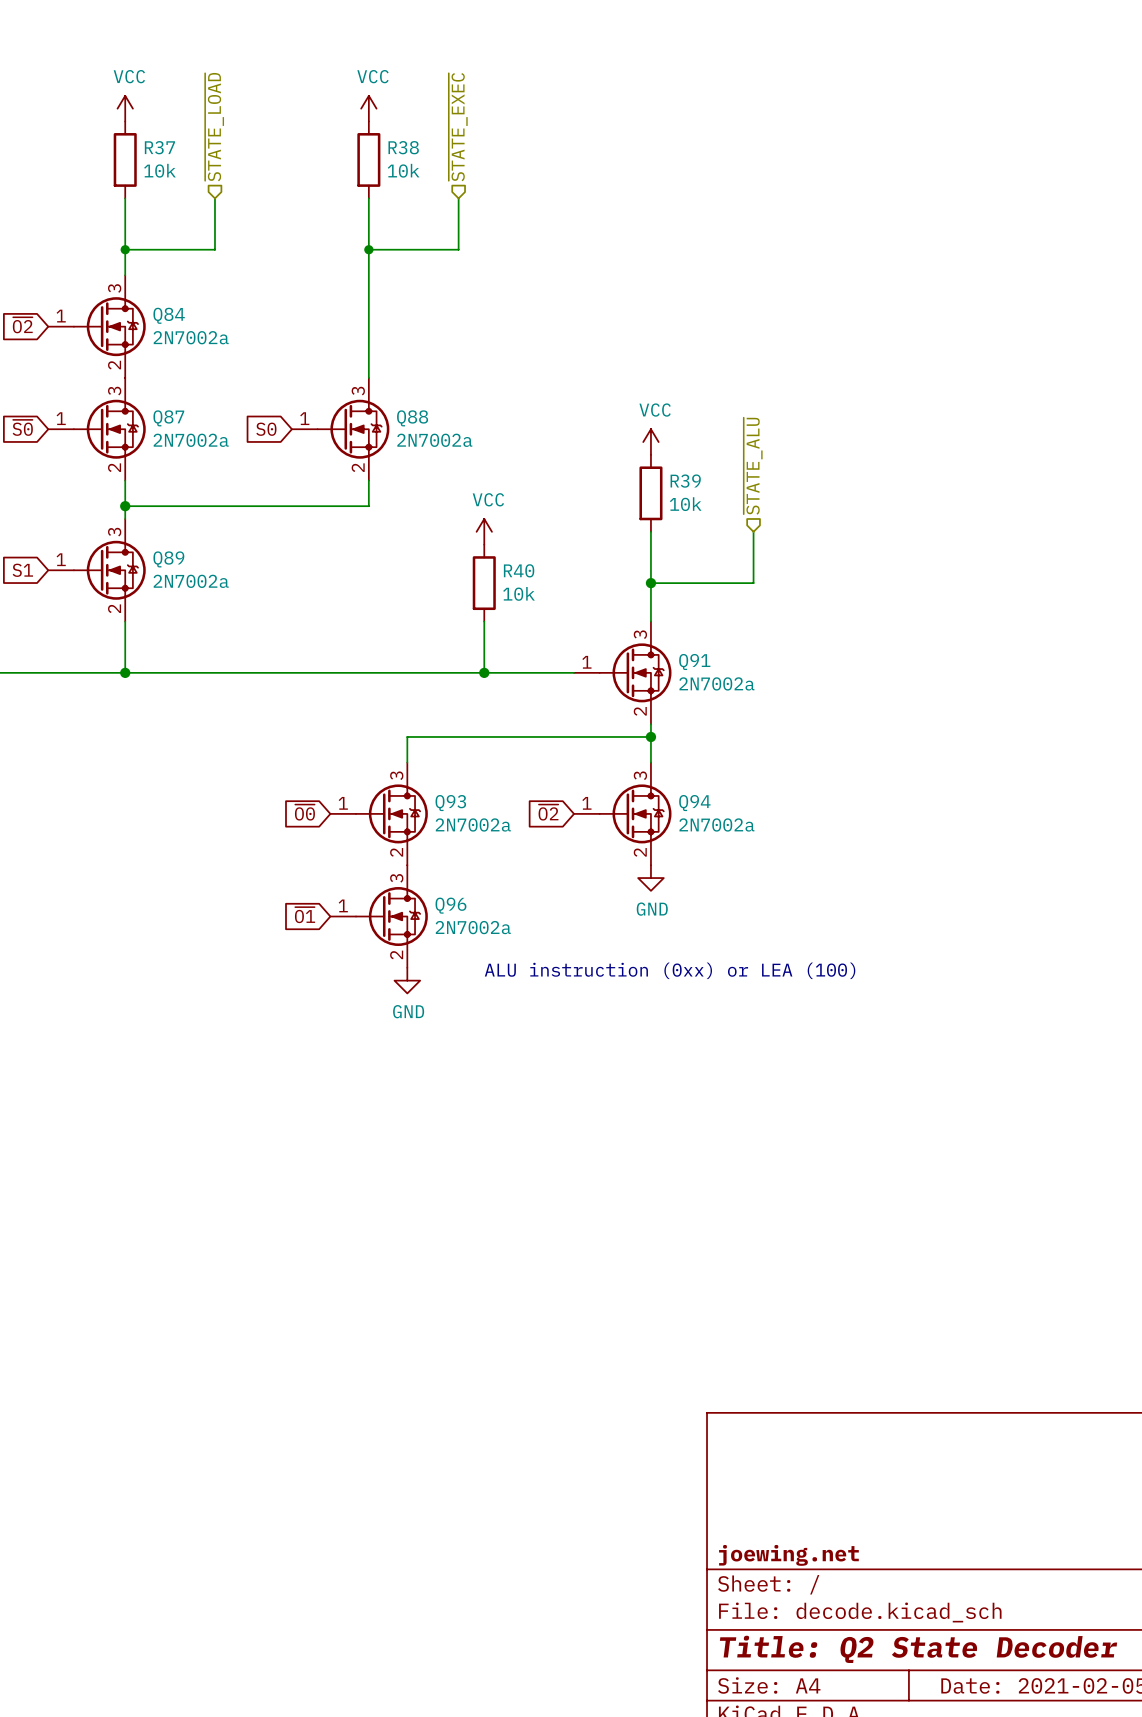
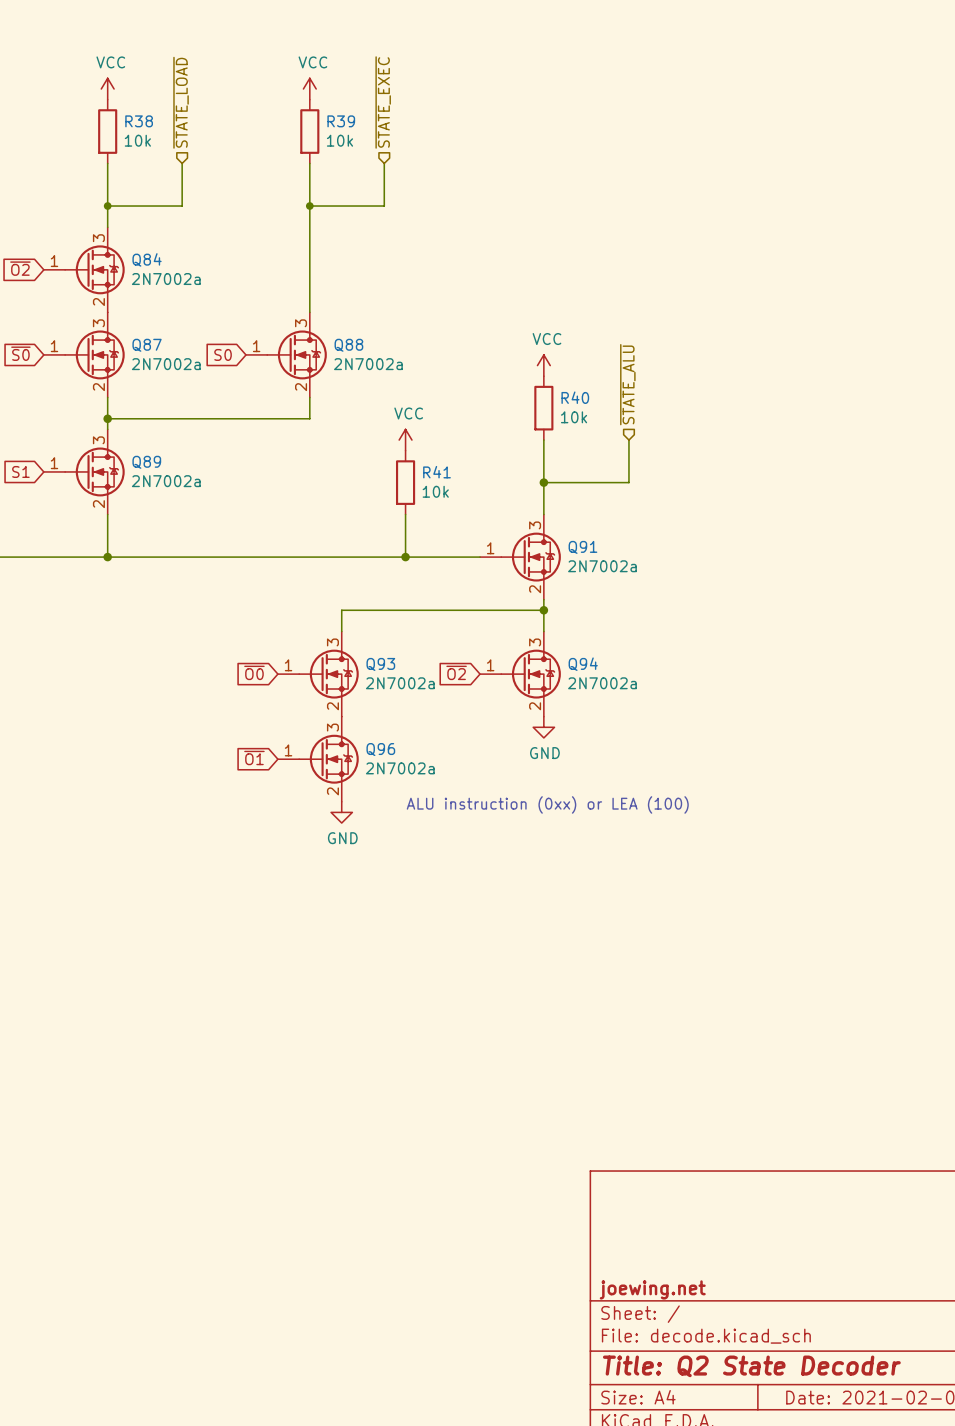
R37 name: R37 (159, 147) -> R38 (139, 121)
R38 name: R38 (403, 147) -> R39 (341, 121)
R39 name: R39 (685, 481) -> R40 (575, 397)
R40 name: R40 (519, 570) -> R41 (437, 472)

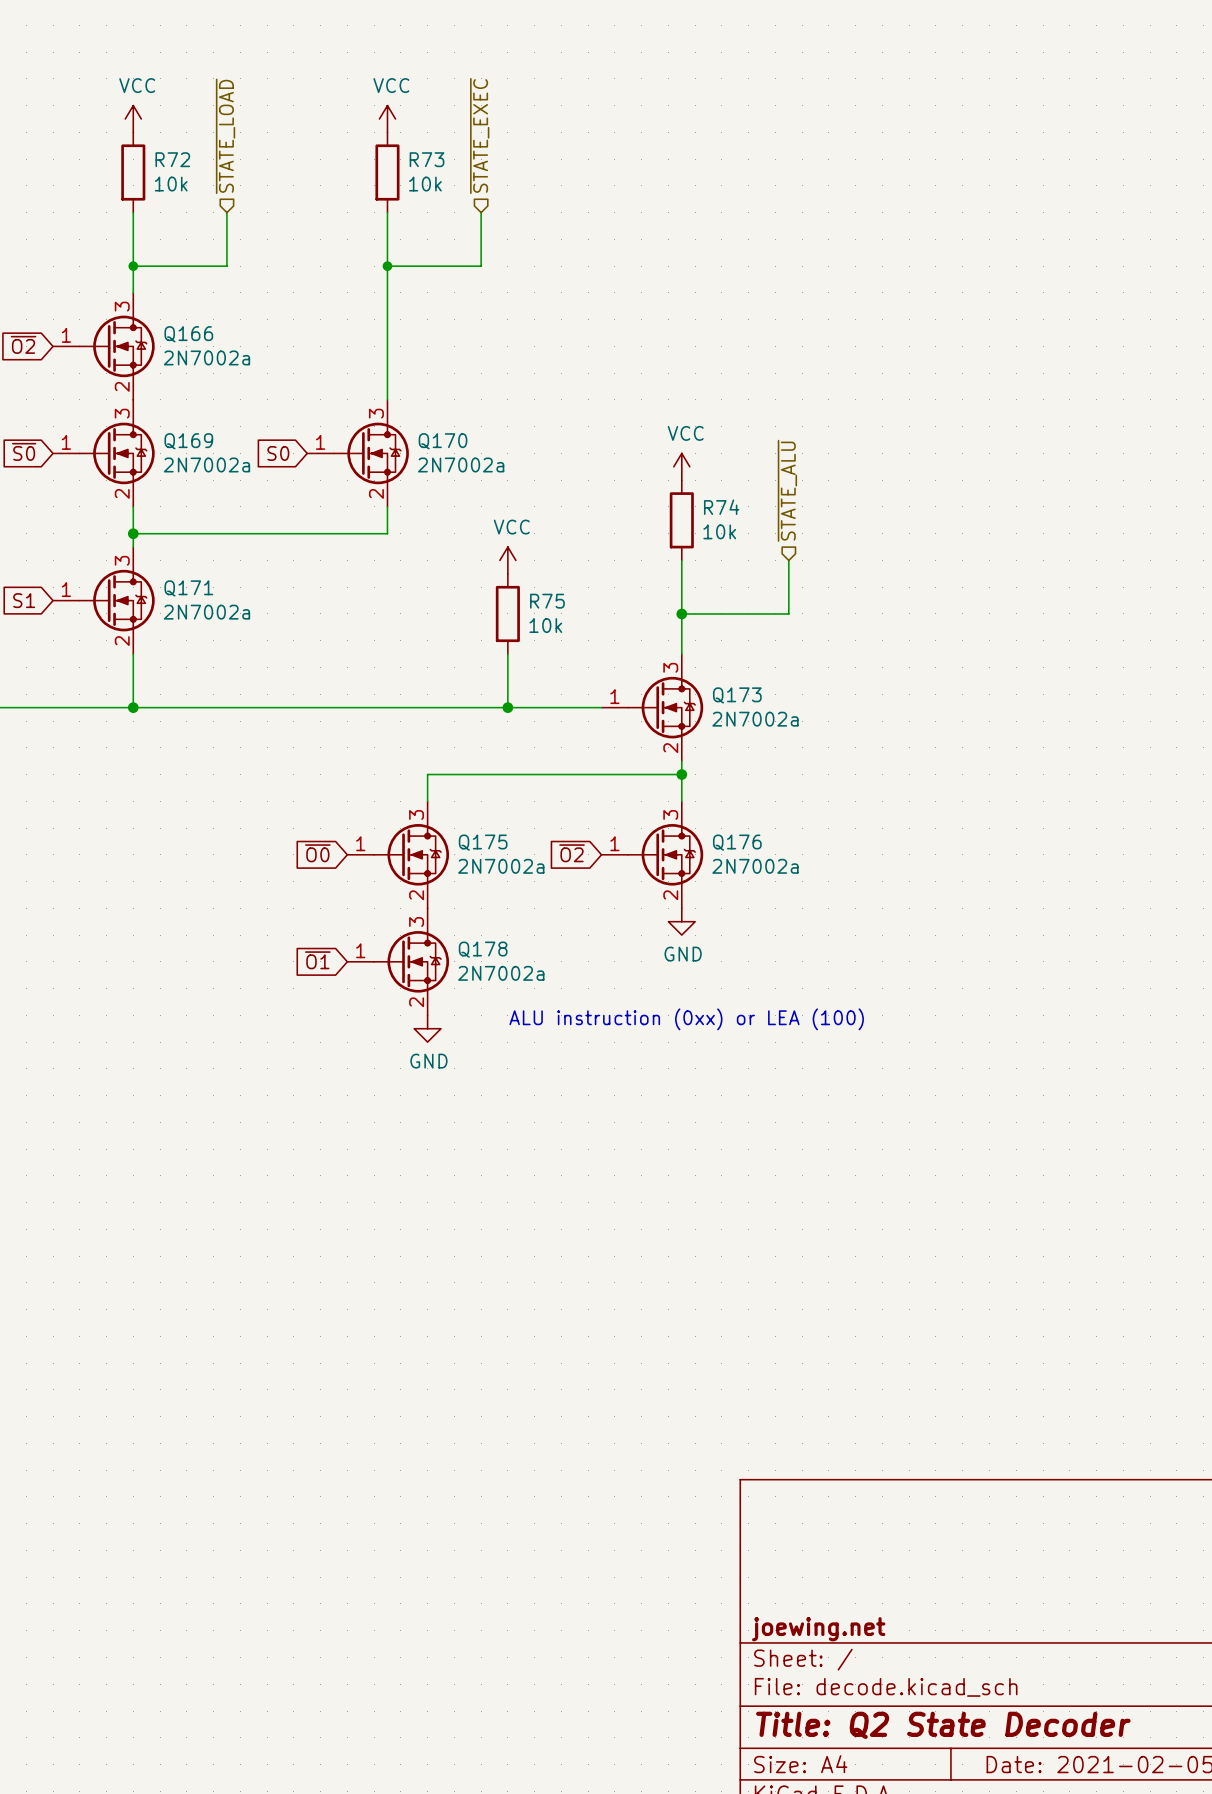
R38 name: R38 (139, 121) -> R72 (172, 159)
R39 name: R39 (341, 121) -> R73 (427, 159)
Q84 name: Q84 (147, 259) -> Q166 (188, 334)
Q87 name: Q87 (147, 345) -> Q169 (188, 441)
Q88 name: Q88 (348, 345) -> Q170 (443, 441)
R40 name: R40 (575, 397) -> R74 (721, 507)
Q89 name: Q89 (146, 462) -> Q171 (188, 588)
R41 name: R41 (437, 472) -> R75 (547, 601)
Q91 name: Q91 (582, 547) -> Q173 (737, 695)
Q93 name: Q93 (380, 664) -> Q175 (483, 842)
Q94 name: Q94 (583, 664) -> Q176 (737, 842)
Q96 name: Q96 (380, 749) -> Q178 (483, 949)

